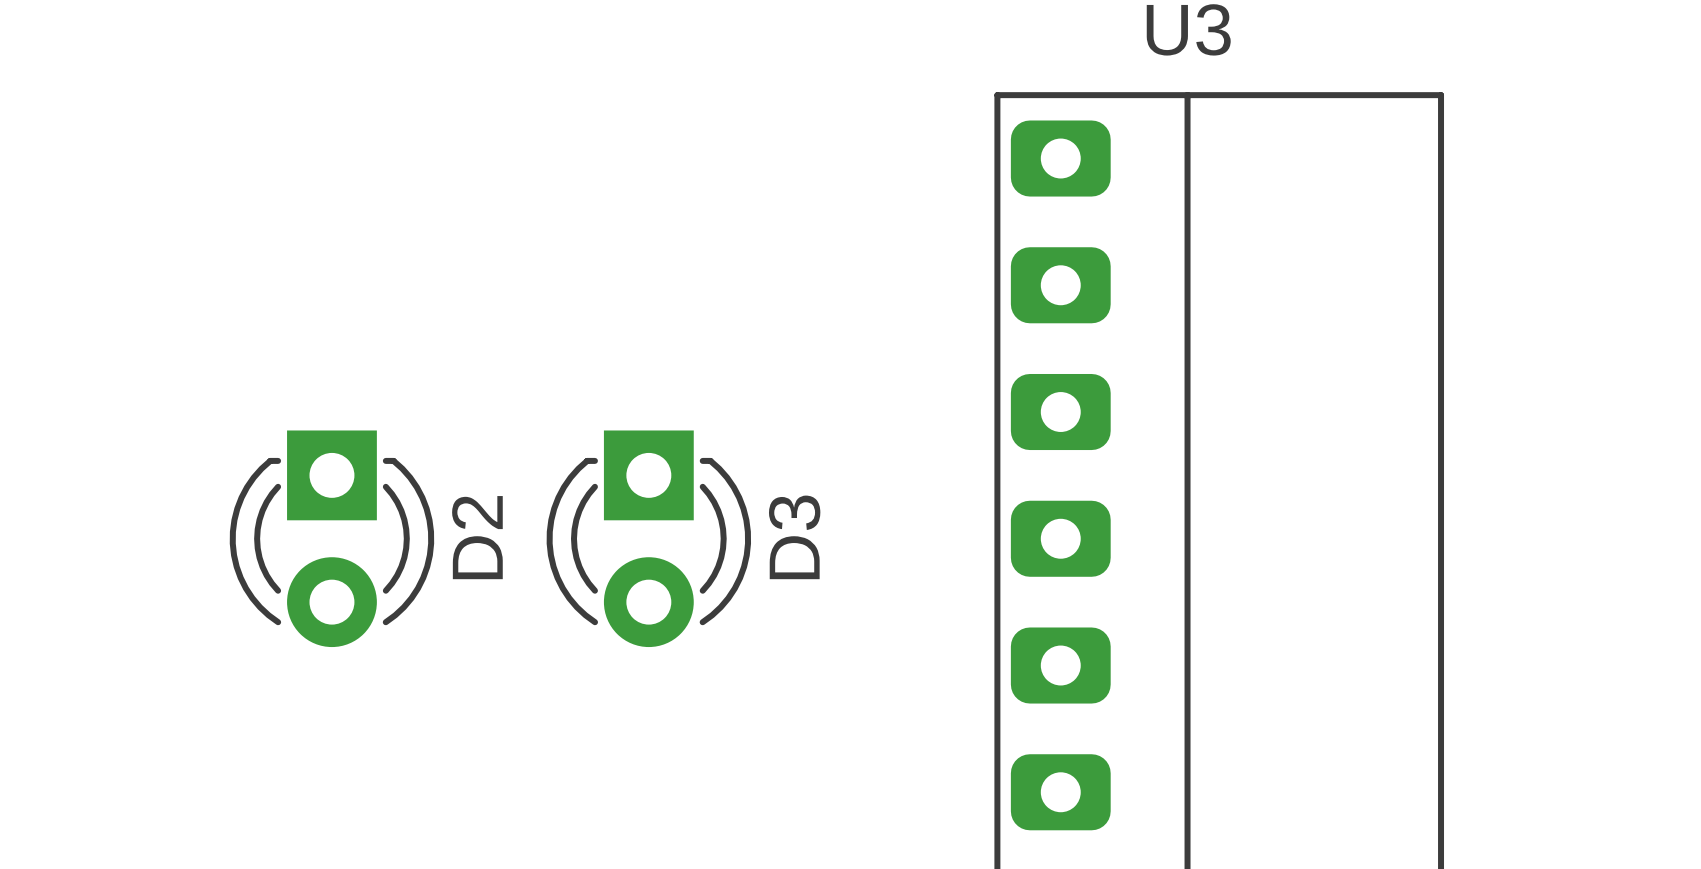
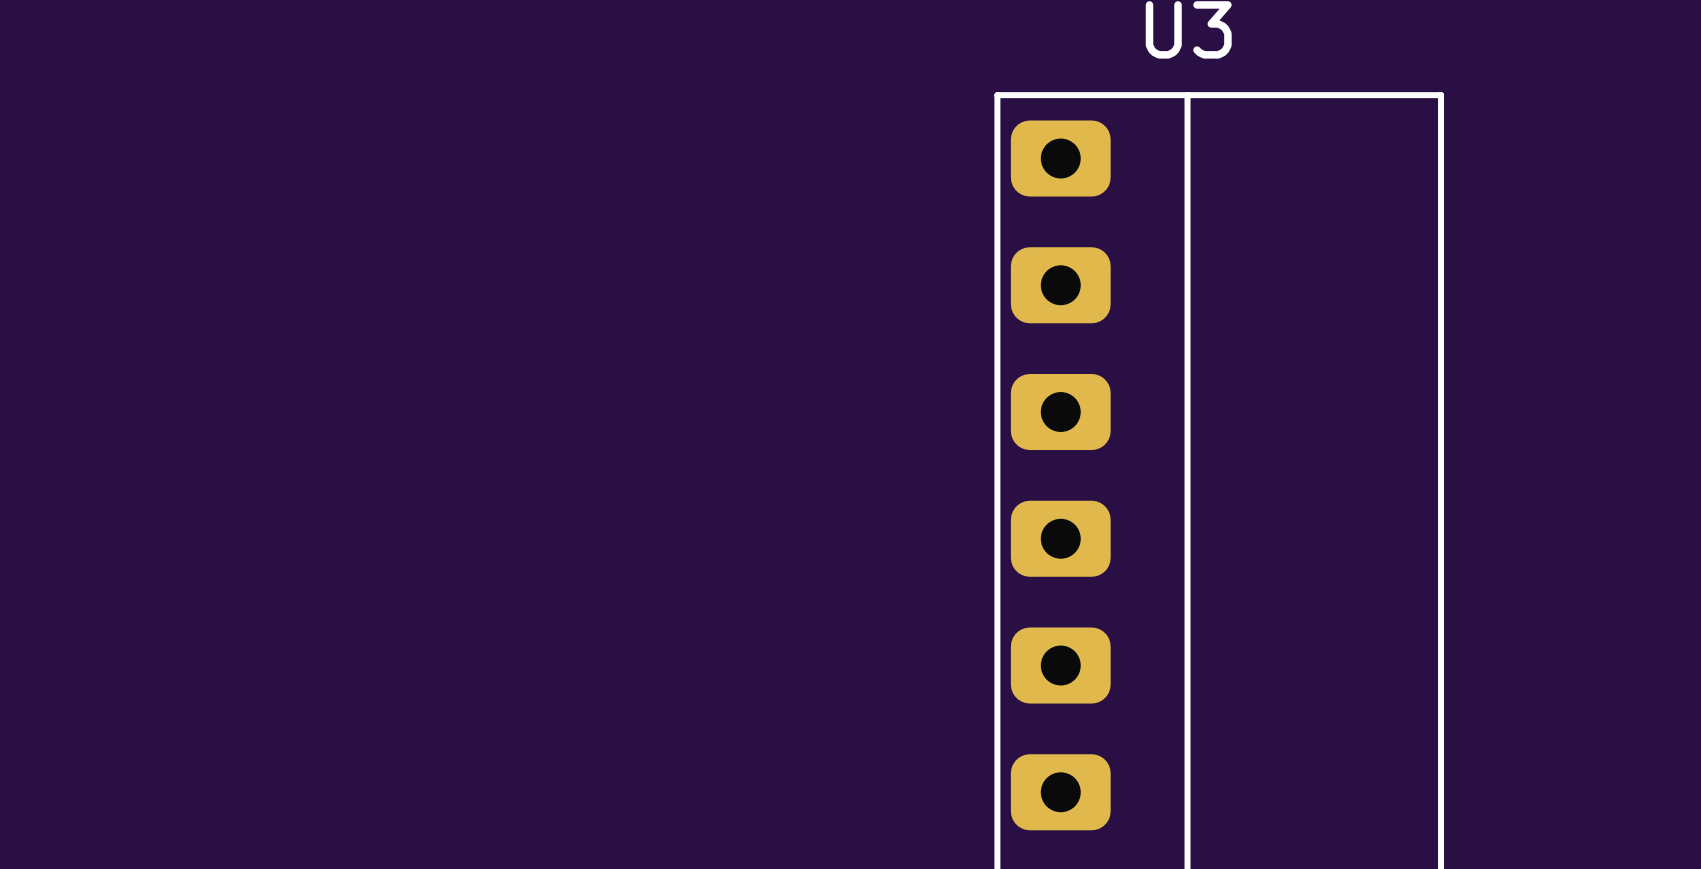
D2: (331, 538) -> none
D3: (648, 538) -> none

